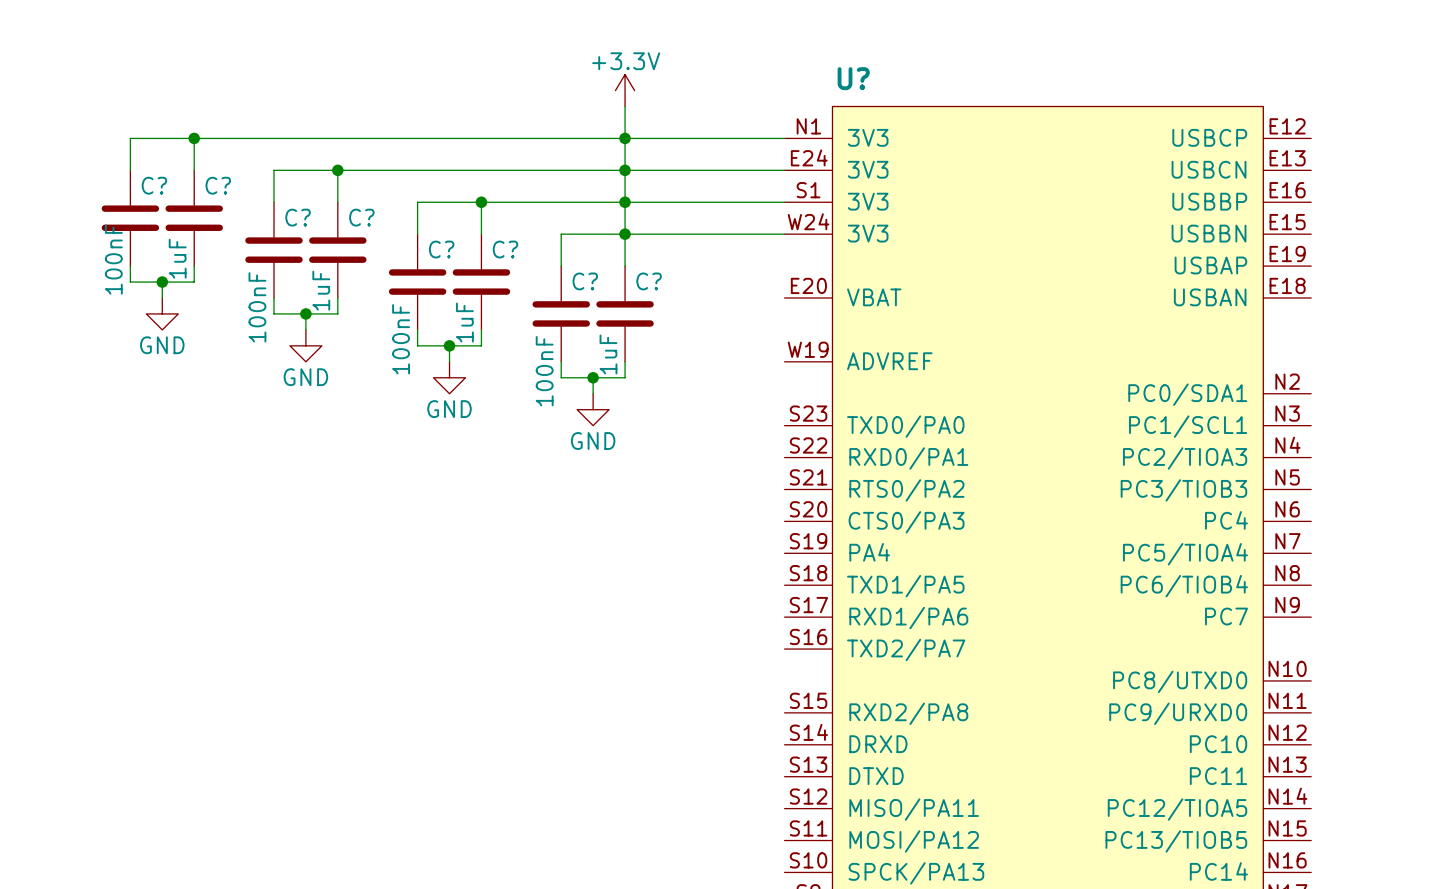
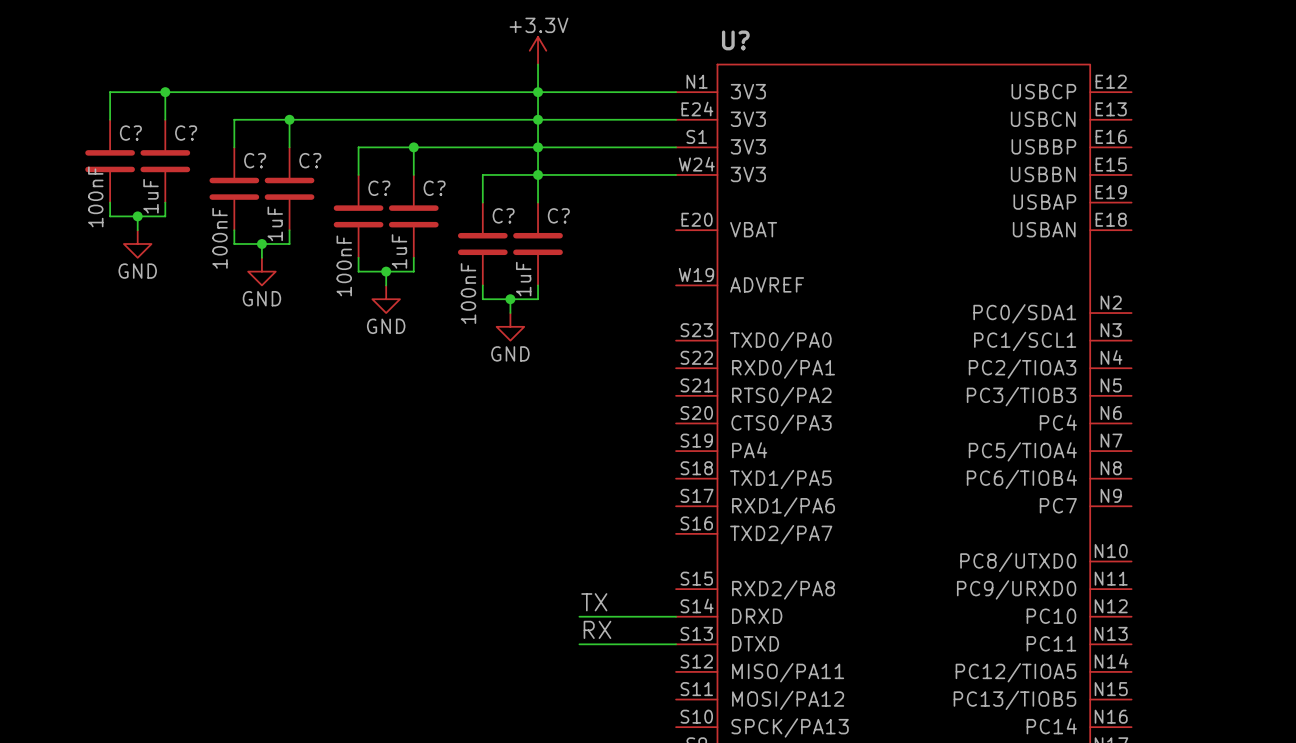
label: none -> TX (594, 602)
wire: none -> (579, 616) (676, 616)
label: none -> RX (597, 629)
wire: none -> (579, 644) (676, 644)

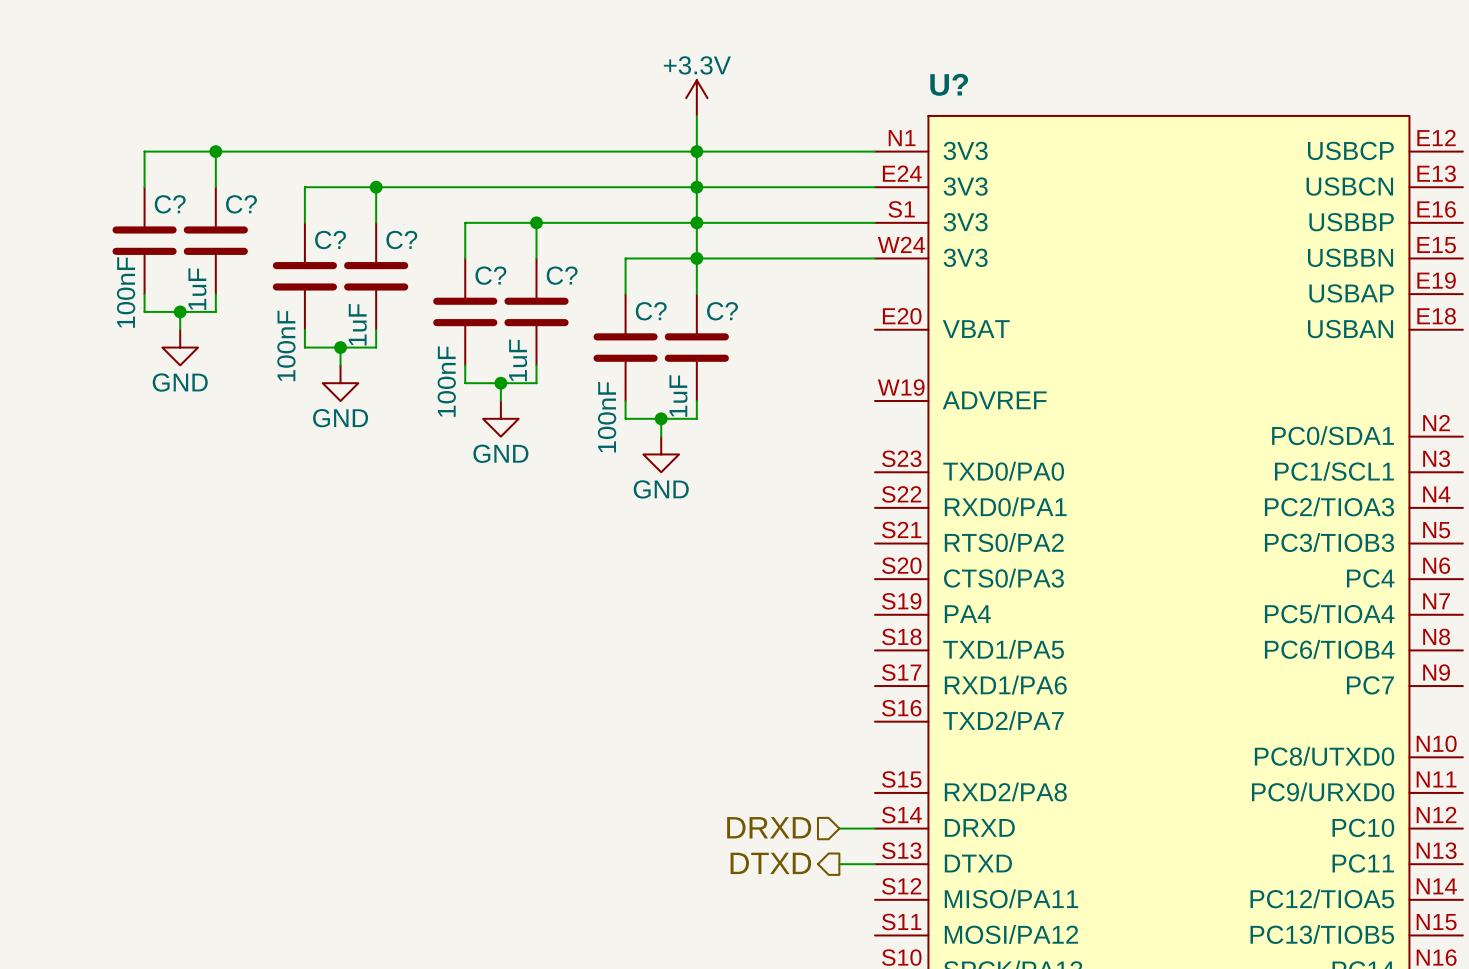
label: TX (594, 602) -> none
wire: (579, 616) (648, 616) -> none
hierarchical label: none -> DRXD (769, 827)
label: RX (597, 629) -> none
hierarchical label: none -> DTXD (770, 863)
wire: (579, 644) (648, 644) -> none

